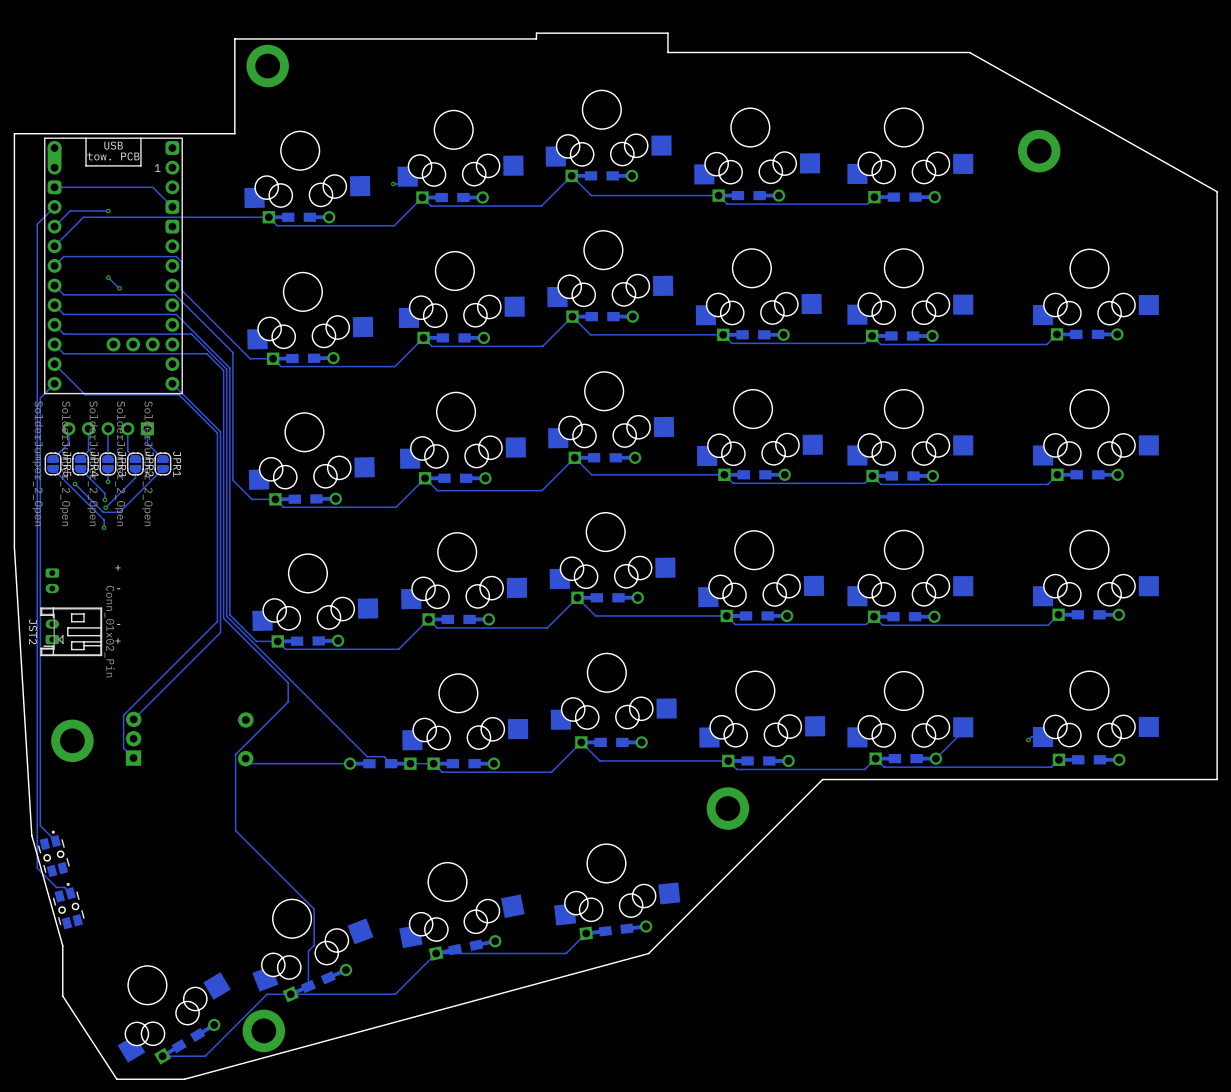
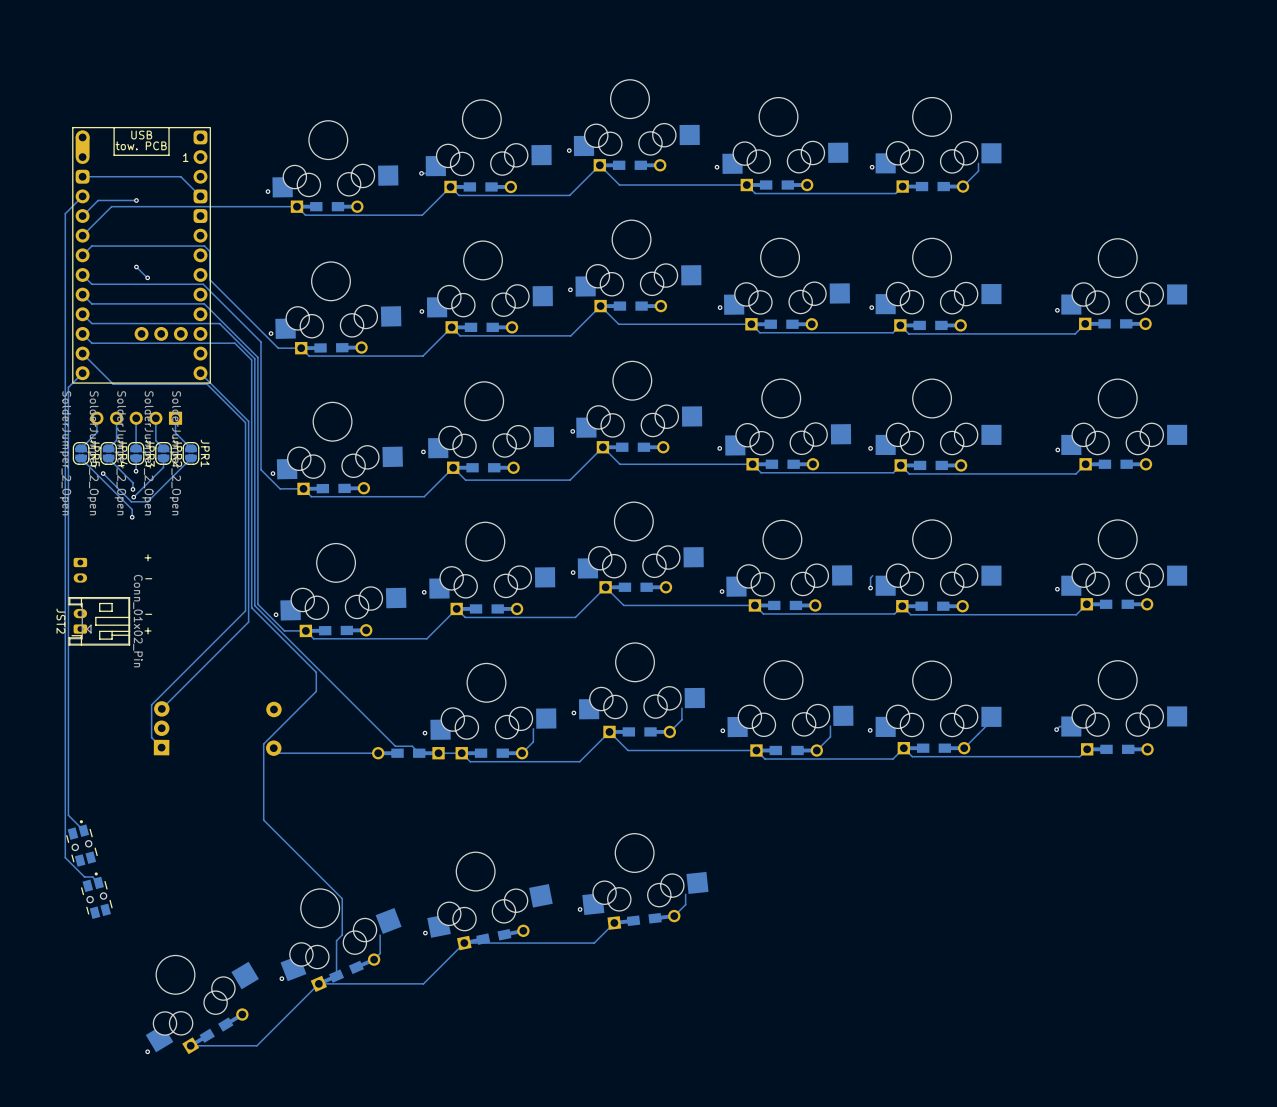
board edge: (667, 33) (536, 33) (536, 38) (234, 38) (234, 133) (14, 133) (14, 547) (31, 835) (62, 945) (62, 996) (116, 1079) (184, 1079) (648, 953) (822, 779) (1217, 779) (1217, 191) (969, 52) (667, 52) (667, 33) -> none
part: (267, 66) -> none
part: (1039, 151) -> none
via: none -> (569, 150)
track: none -> (978, 163) (978, 171) (963, 186)
via: none -> (717, 167)
via: none -> (872, 167)
via: none -> (267, 191)
via: none -> (570, 289)
via: none -> (720, 307)
via: none -> (871, 307)
via: none -> (1057, 310)
via: none -> (421, 311)
via: none -> (271, 333)
via: none -> (572, 431)
via: none -> (719, 448)
via: none -> (870, 448)
via: none -> (1057, 449)
via: none -> (423, 451)
via: none -> (272, 473)
via: none -> (573, 572)
track: none -> (872, 575) (870, 577) (870, 588)
via: none -> (870, 588)
via: none -> (1057, 589)
via: none -> (424, 592)
via: none -> (722, 591)
via: none -> (276, 614)
track: none -> (681, 708) (681, 719) (669, 731)
via: none -> (573, 712)
track: none -> (830, 726) (830, 736) (816, 750)
track: none -> (533, 728) (533, 741) (522, 753)
part: (72, 740) -> none
via: none -> (870, 730)
via: none -> (722, 730)
via: none -> (424, 733)
part: (727, 808) -> none
track: none -> (685, 894) (685, 904) (674, 916)
via: none -> (580, 909)
via: none -> (425, 933)
track: none -> (380, 935) (380, 953) (374, 959)
via: none -> (281, 978)
track: (290, 994) (267, 994) (205, 1056) -> (318, 983) (256, 1045) (233, 1045)
part: (263, 1030) -> none
via: none -> (147, 1051)

